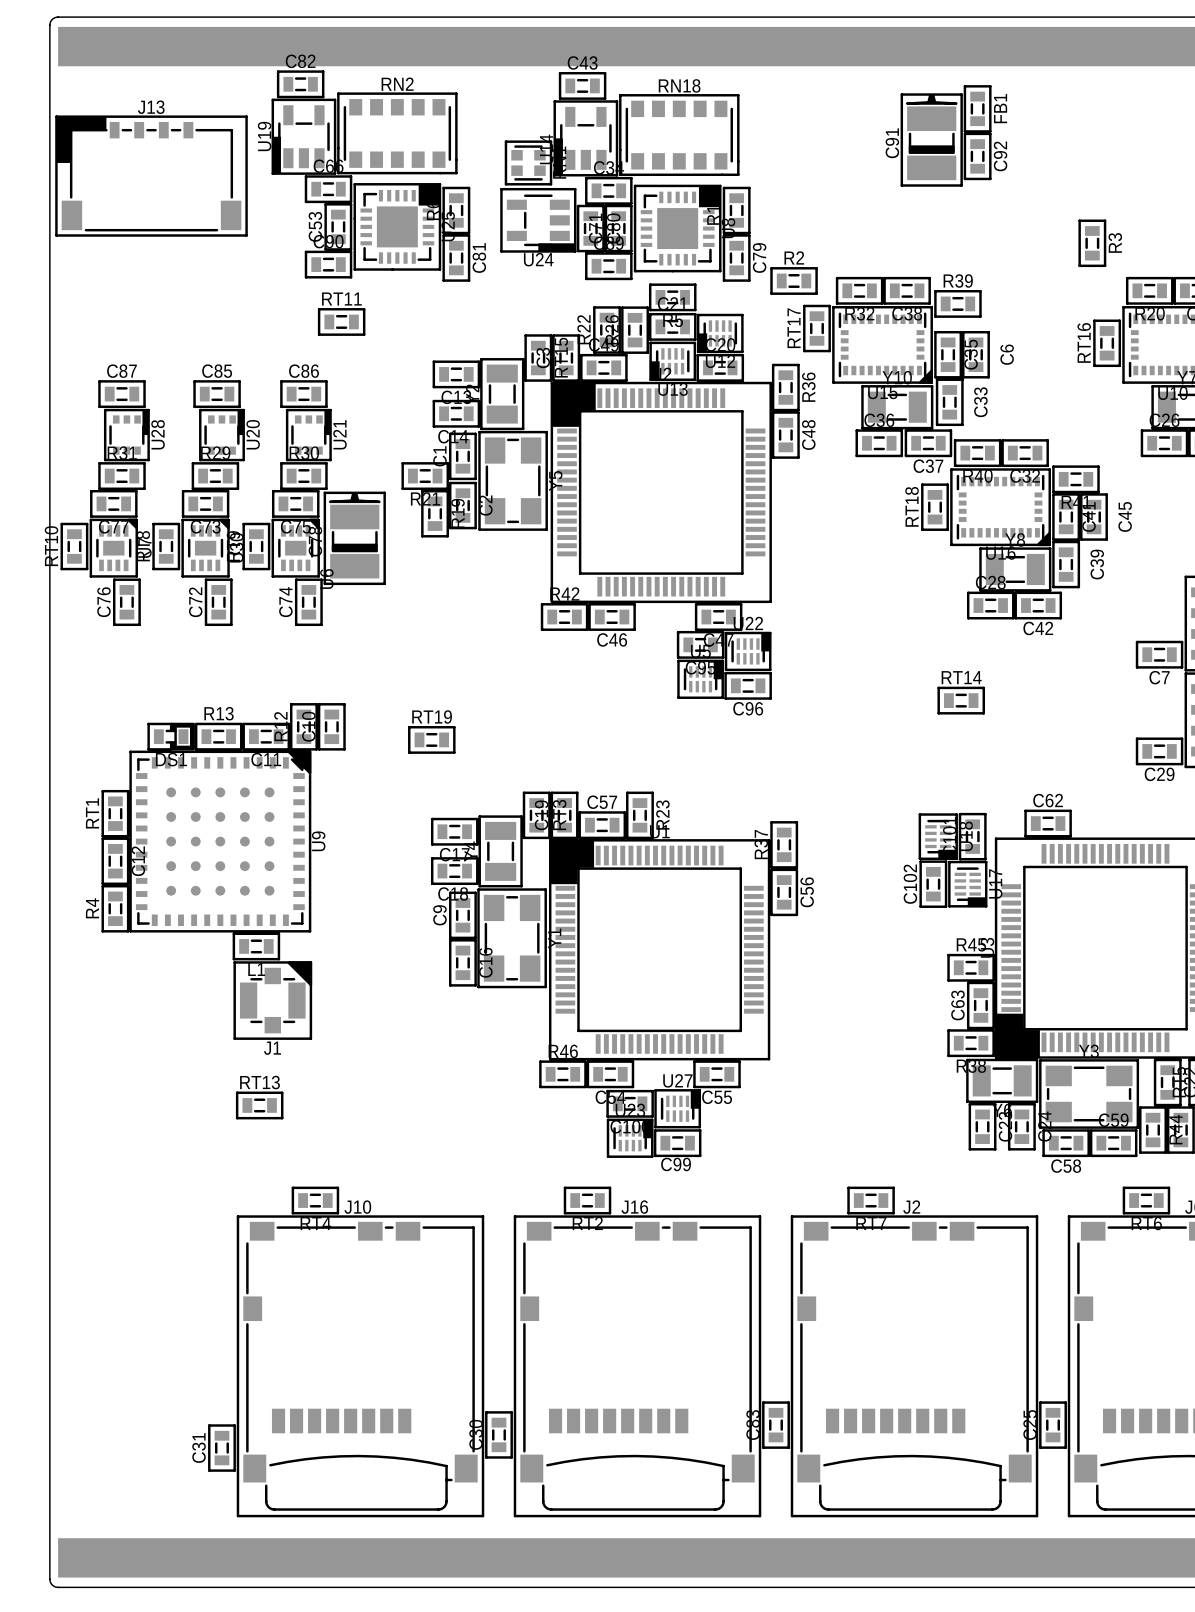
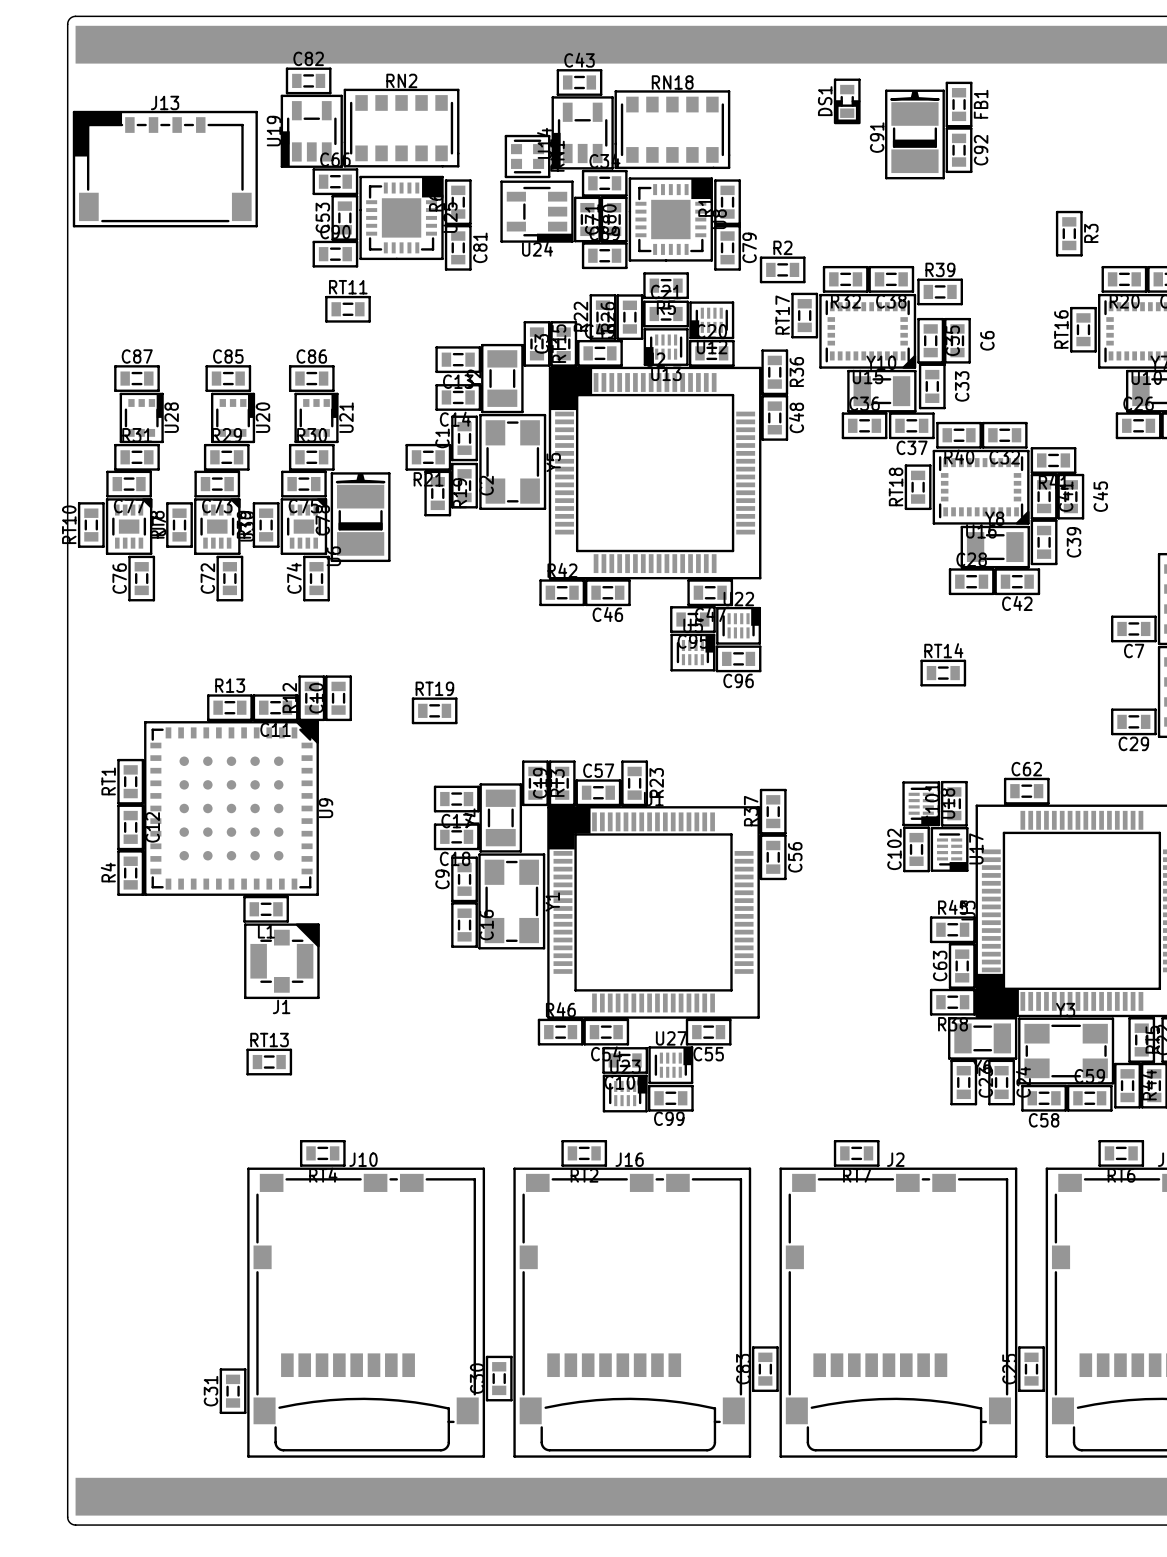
DS1 rotation: 0° (171, 736) -> 90° clockwise (847, 101)
DS1 position: (171, 736) -> (847, 101)

